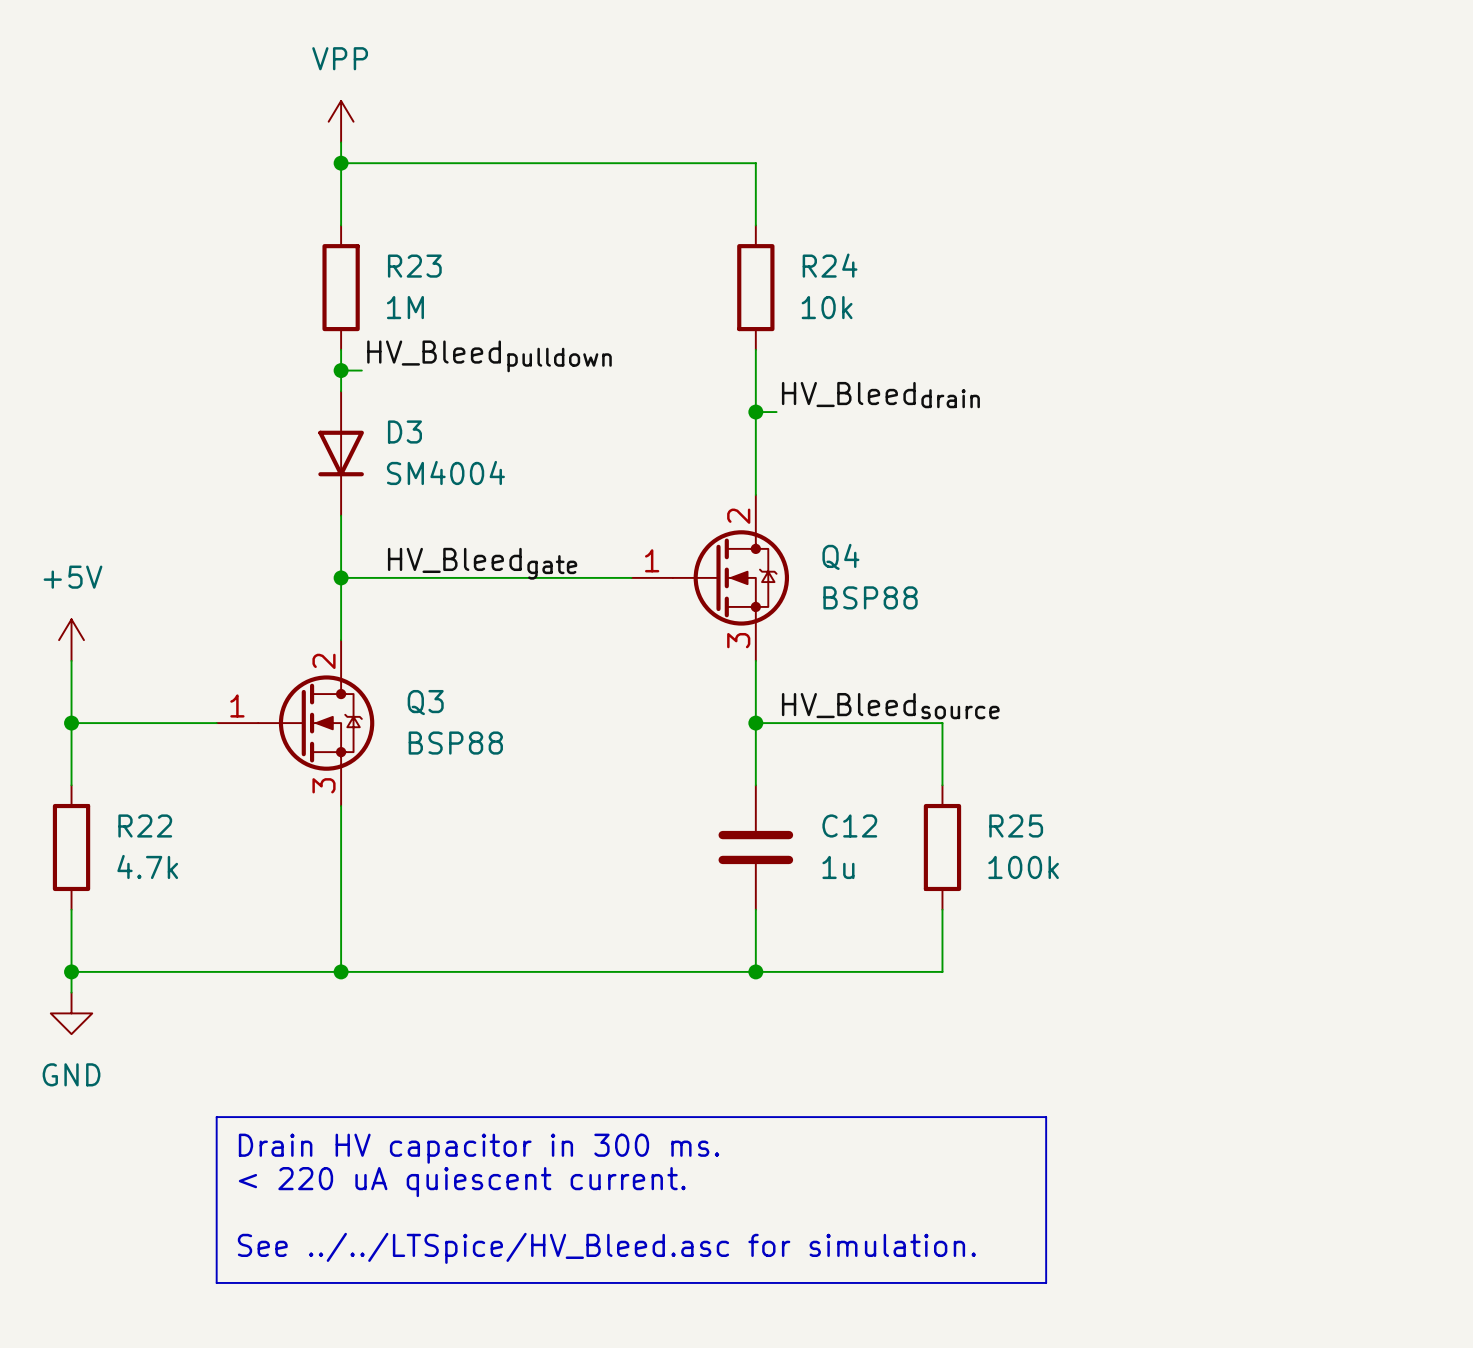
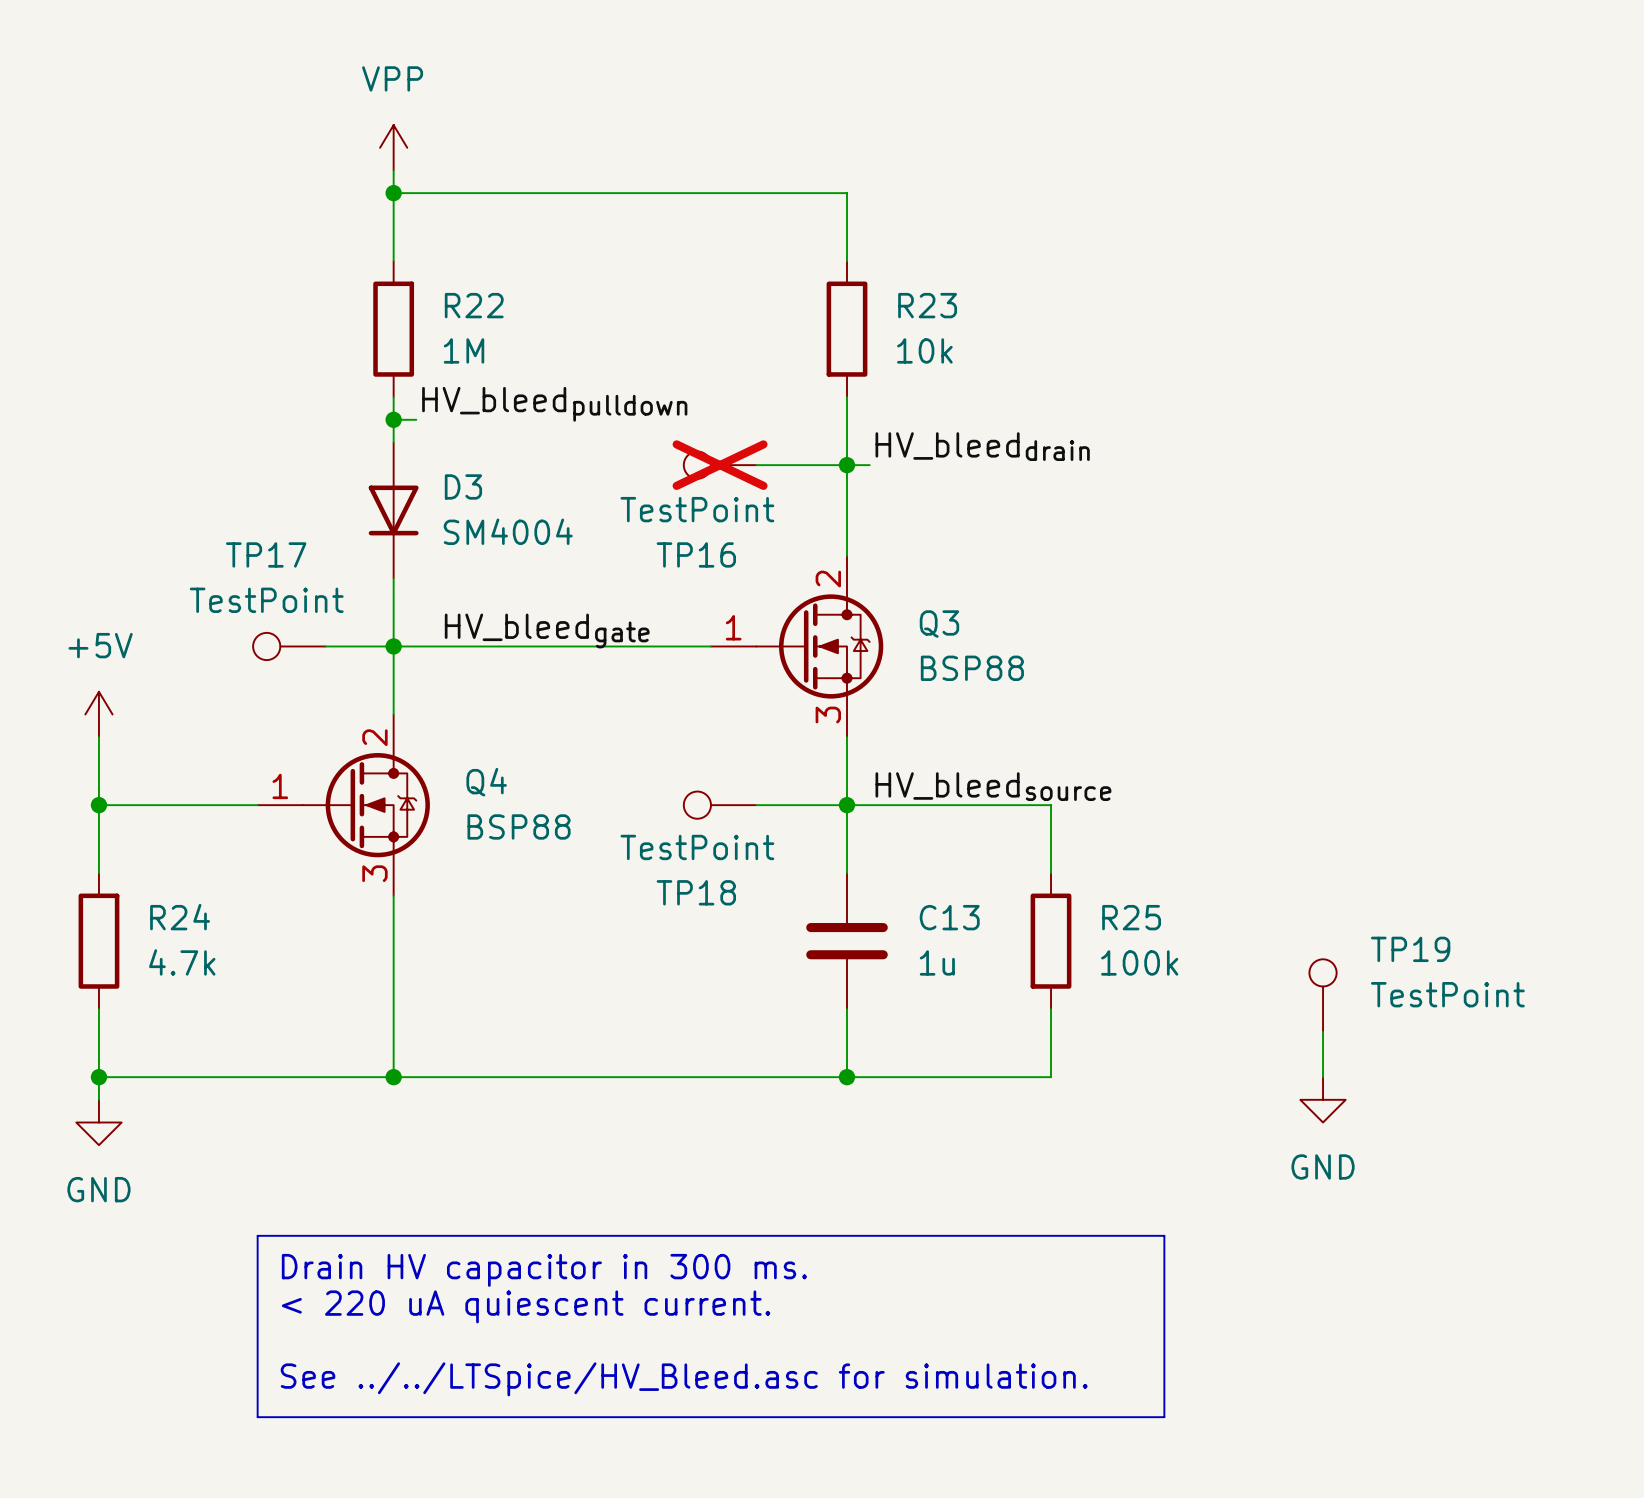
R24 name: R24 (830, 265) -> R23 (927, 305)
R23 name: R23 (414, 266) -> R22 (474, 305)
label: HV_Bleedpulldown (489, 356) -> HV_bleedpulldown (554, 404)
label: HV_Bleeddrain (880, 395) -> HV_bleeddrain (982, 446)
TP16: none -> TestPoint (720, 465)
wire: none -> (756, 465) (847, 465)
Q4 name: Q4 (840, 556) -> Q3 (939, 624)
label: HV_Bleedgate (482, 563) -> HV_bleedgate (547, 630)
TP17: none -> TestPoint (289, 646)
wire: none -> (325, 646) (393, 646)
Q3 name: Q3 (425, 702) -> Q4 (486, 782)
label: HV_Bleedsource (890, 706) -> HV_bleedsource (993, 786)
TP18: none -> TestPoint (720, 805)
wire: none -> (756, 805) (847, 805)
R22 name: R22 (145, 825) -> R24 (180, 917)
C12 name: C12 (849, 825) -> C13 (949, 917)
TP19: none -> TestPoint (1323, 995)
wire: none -> (1323, 1031) (1323, 1077)
power symbol: none -> GND (1323, 1099)

